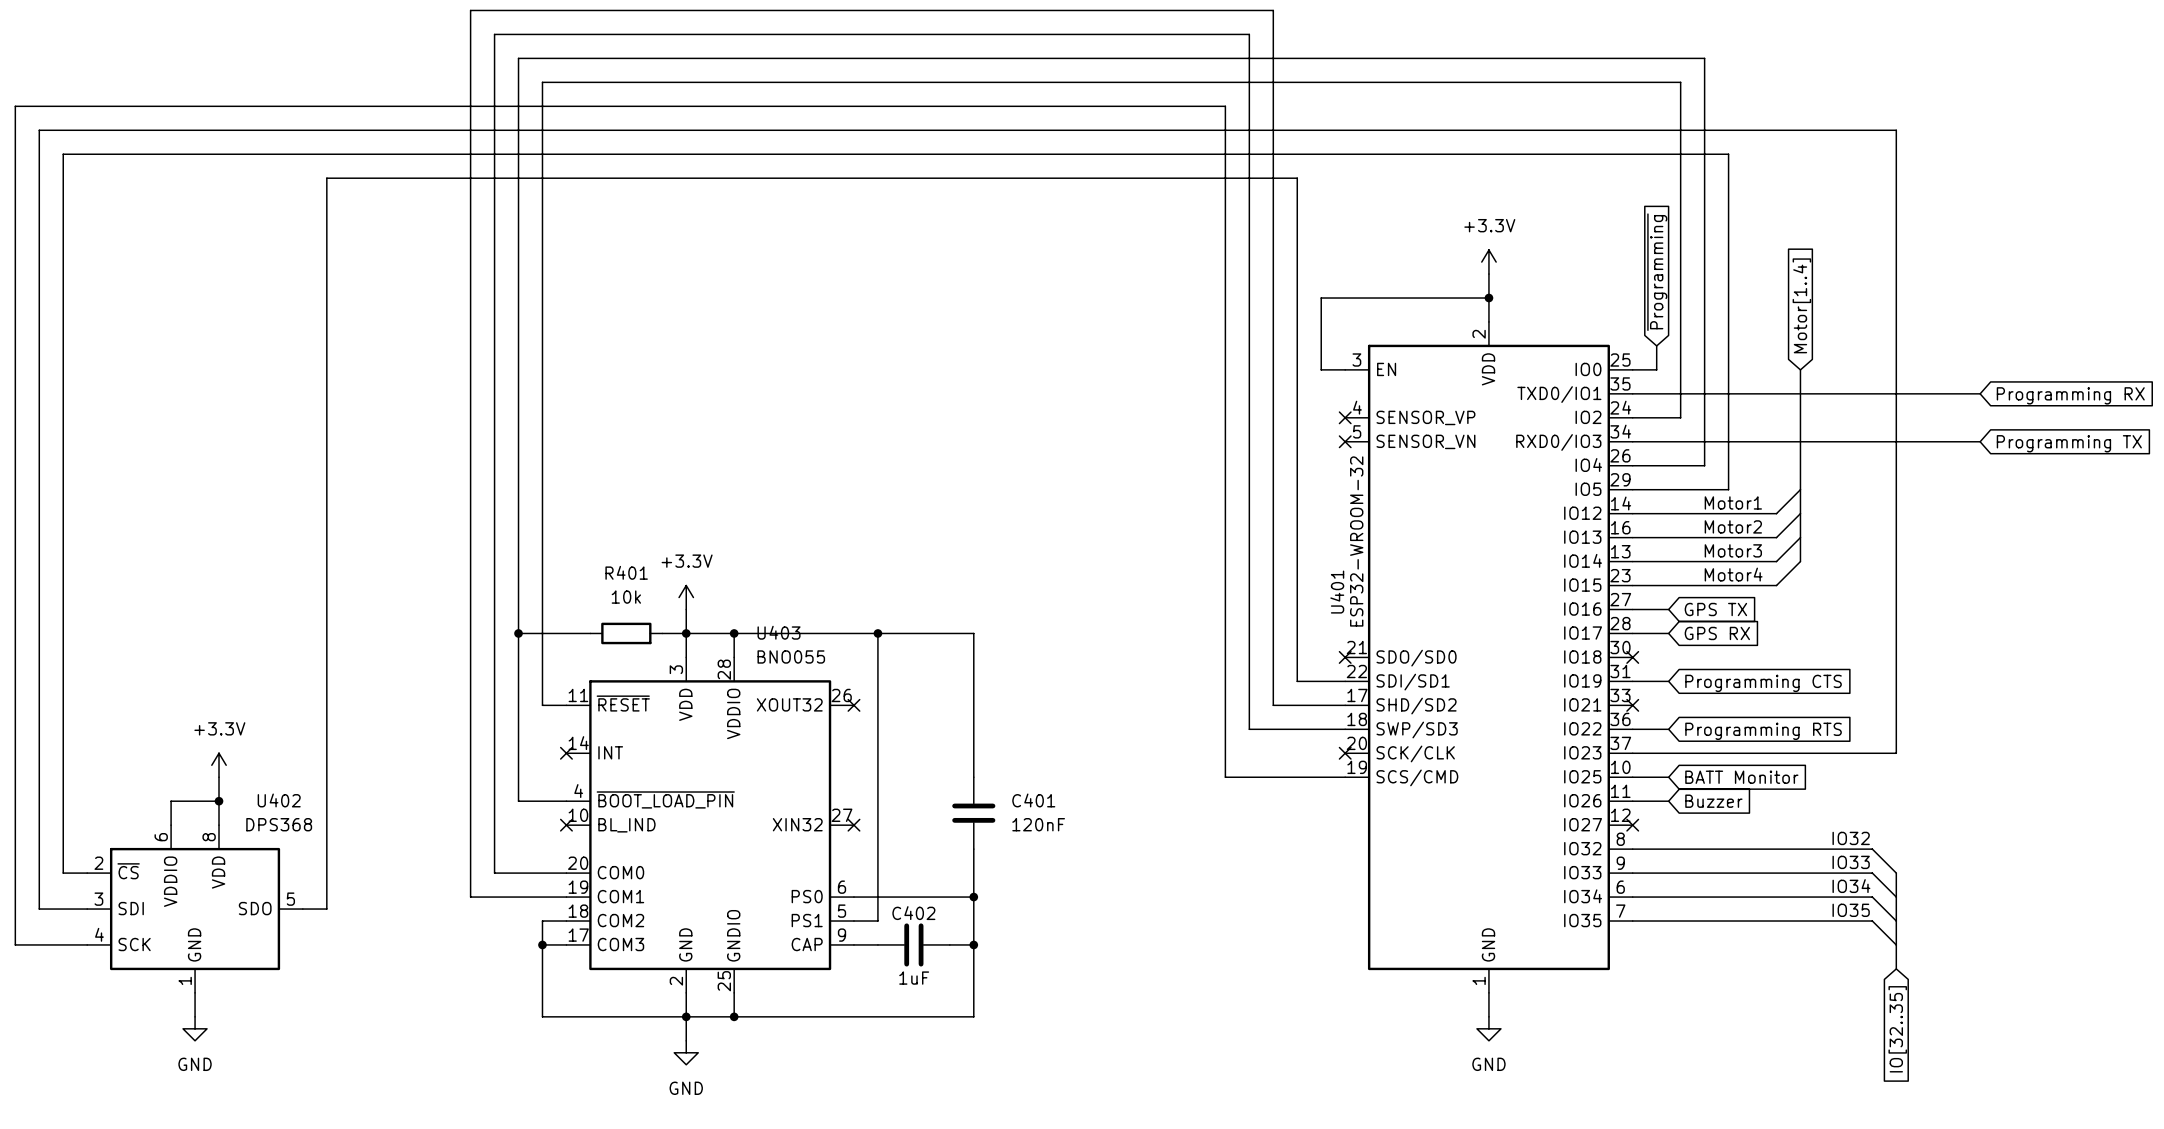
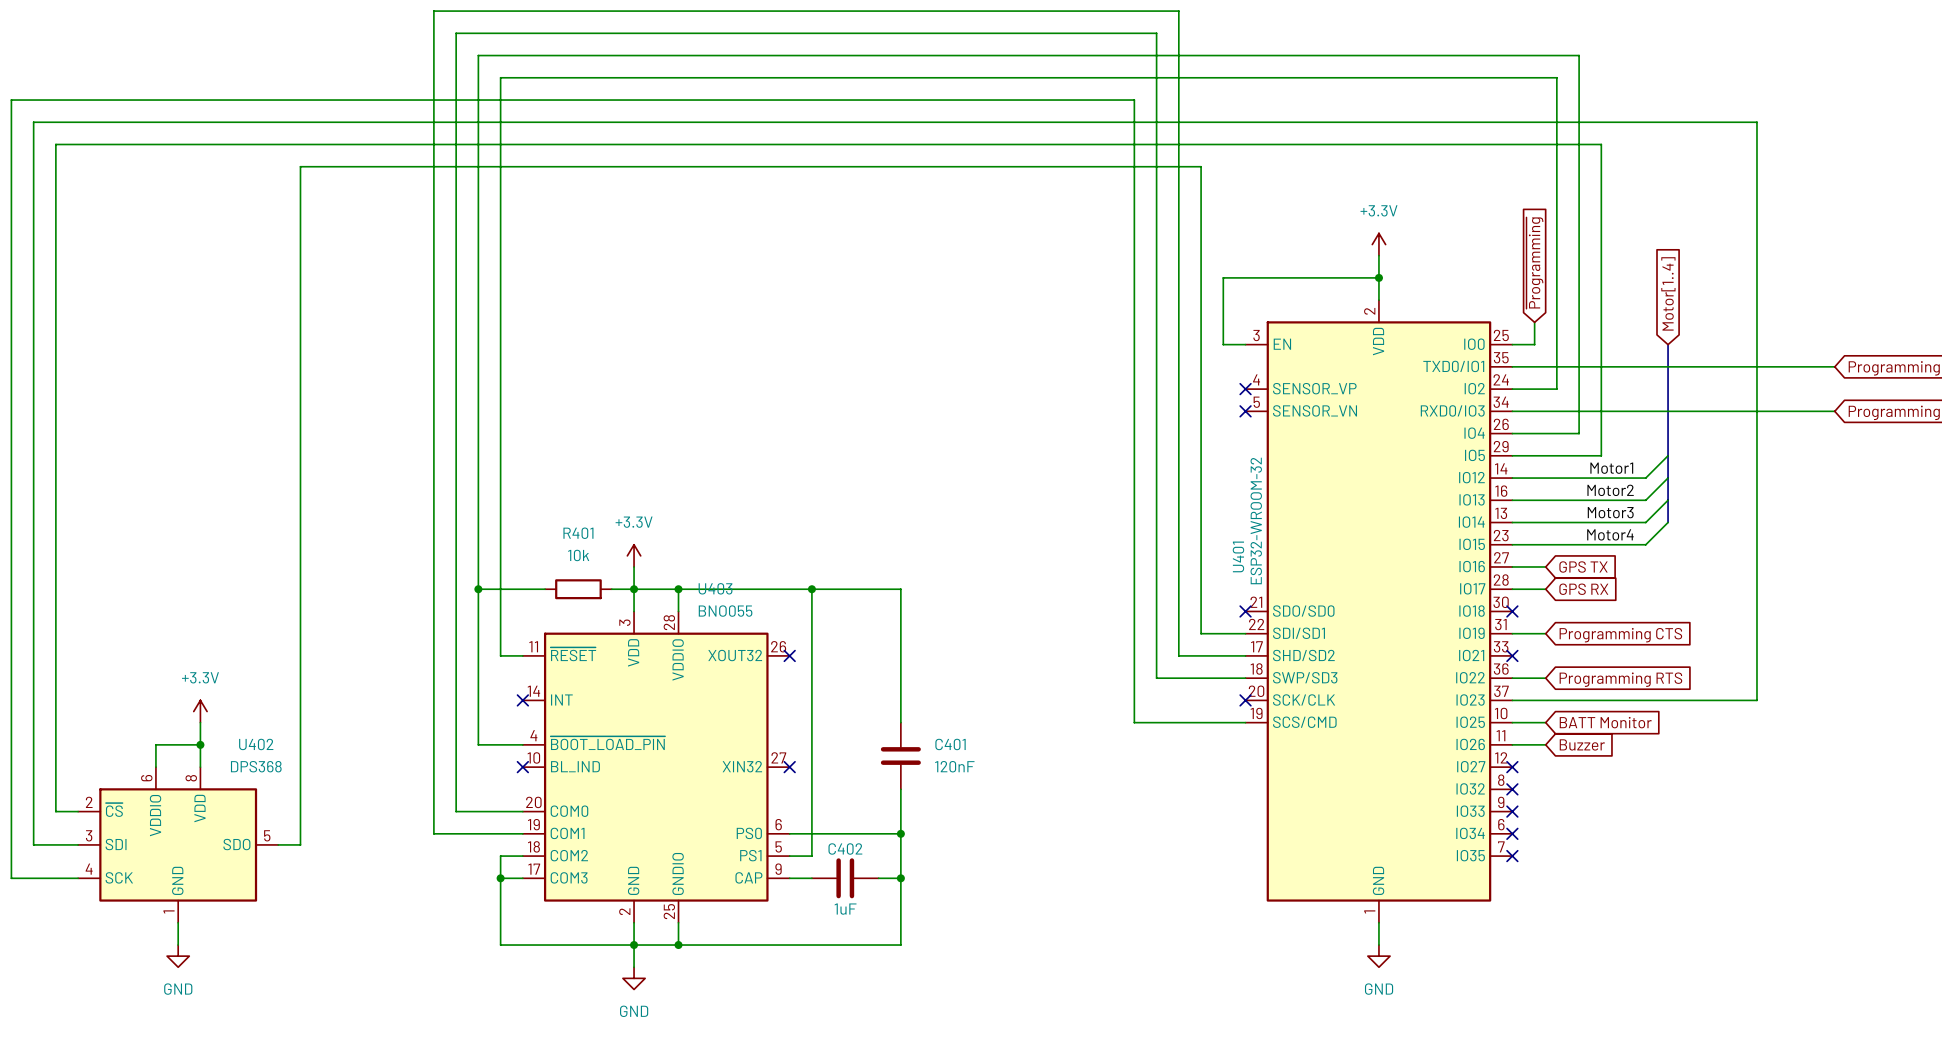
label: IO32 (1851, 838) -> none
wire: (1632, 849) (1872, 849) (1896, 873) -> none
no-connect mark: none -> (1512, 789)
label: IO33 (1851, 862) -> none
wire: (1632, 873) (1872, 873) (1896, 897) -> none
no-connect mark: none -> (1512, 811)
bus: (1896, 873) (1896, 968) -> none
label: IO34 (1851, 886) -> none
wire: (1632, 897) (1872, 897) (1896, 921) -> none
no-connect mark: none -> (1512, 833)
label: IO35 (1851, 910) -> none
wire: (1632, 921) (1872, 921) (1896, 944) -> none
no-connect mark: none -> (1512, 856)
global label: IO[32..35] (1897, 1029) -> none

